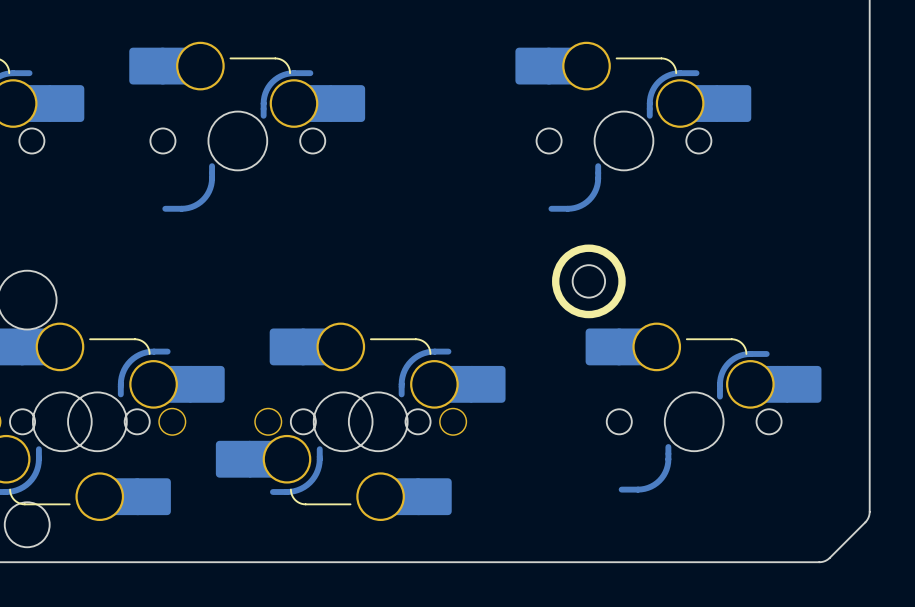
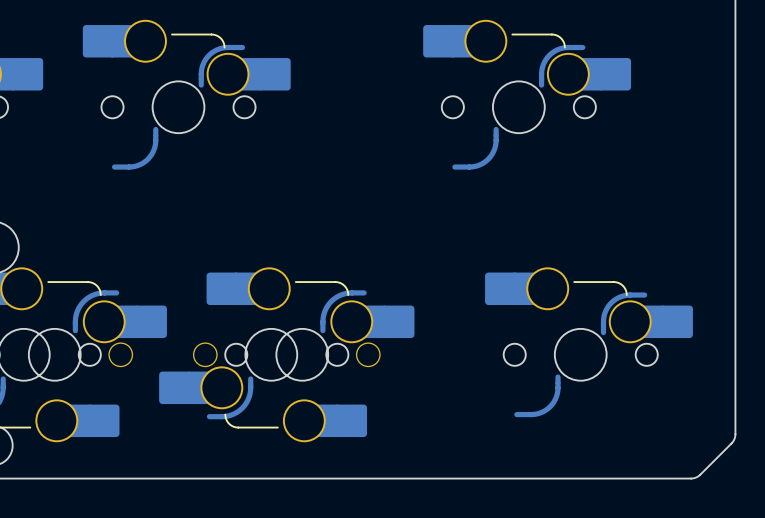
part: (588, 281) -> none

